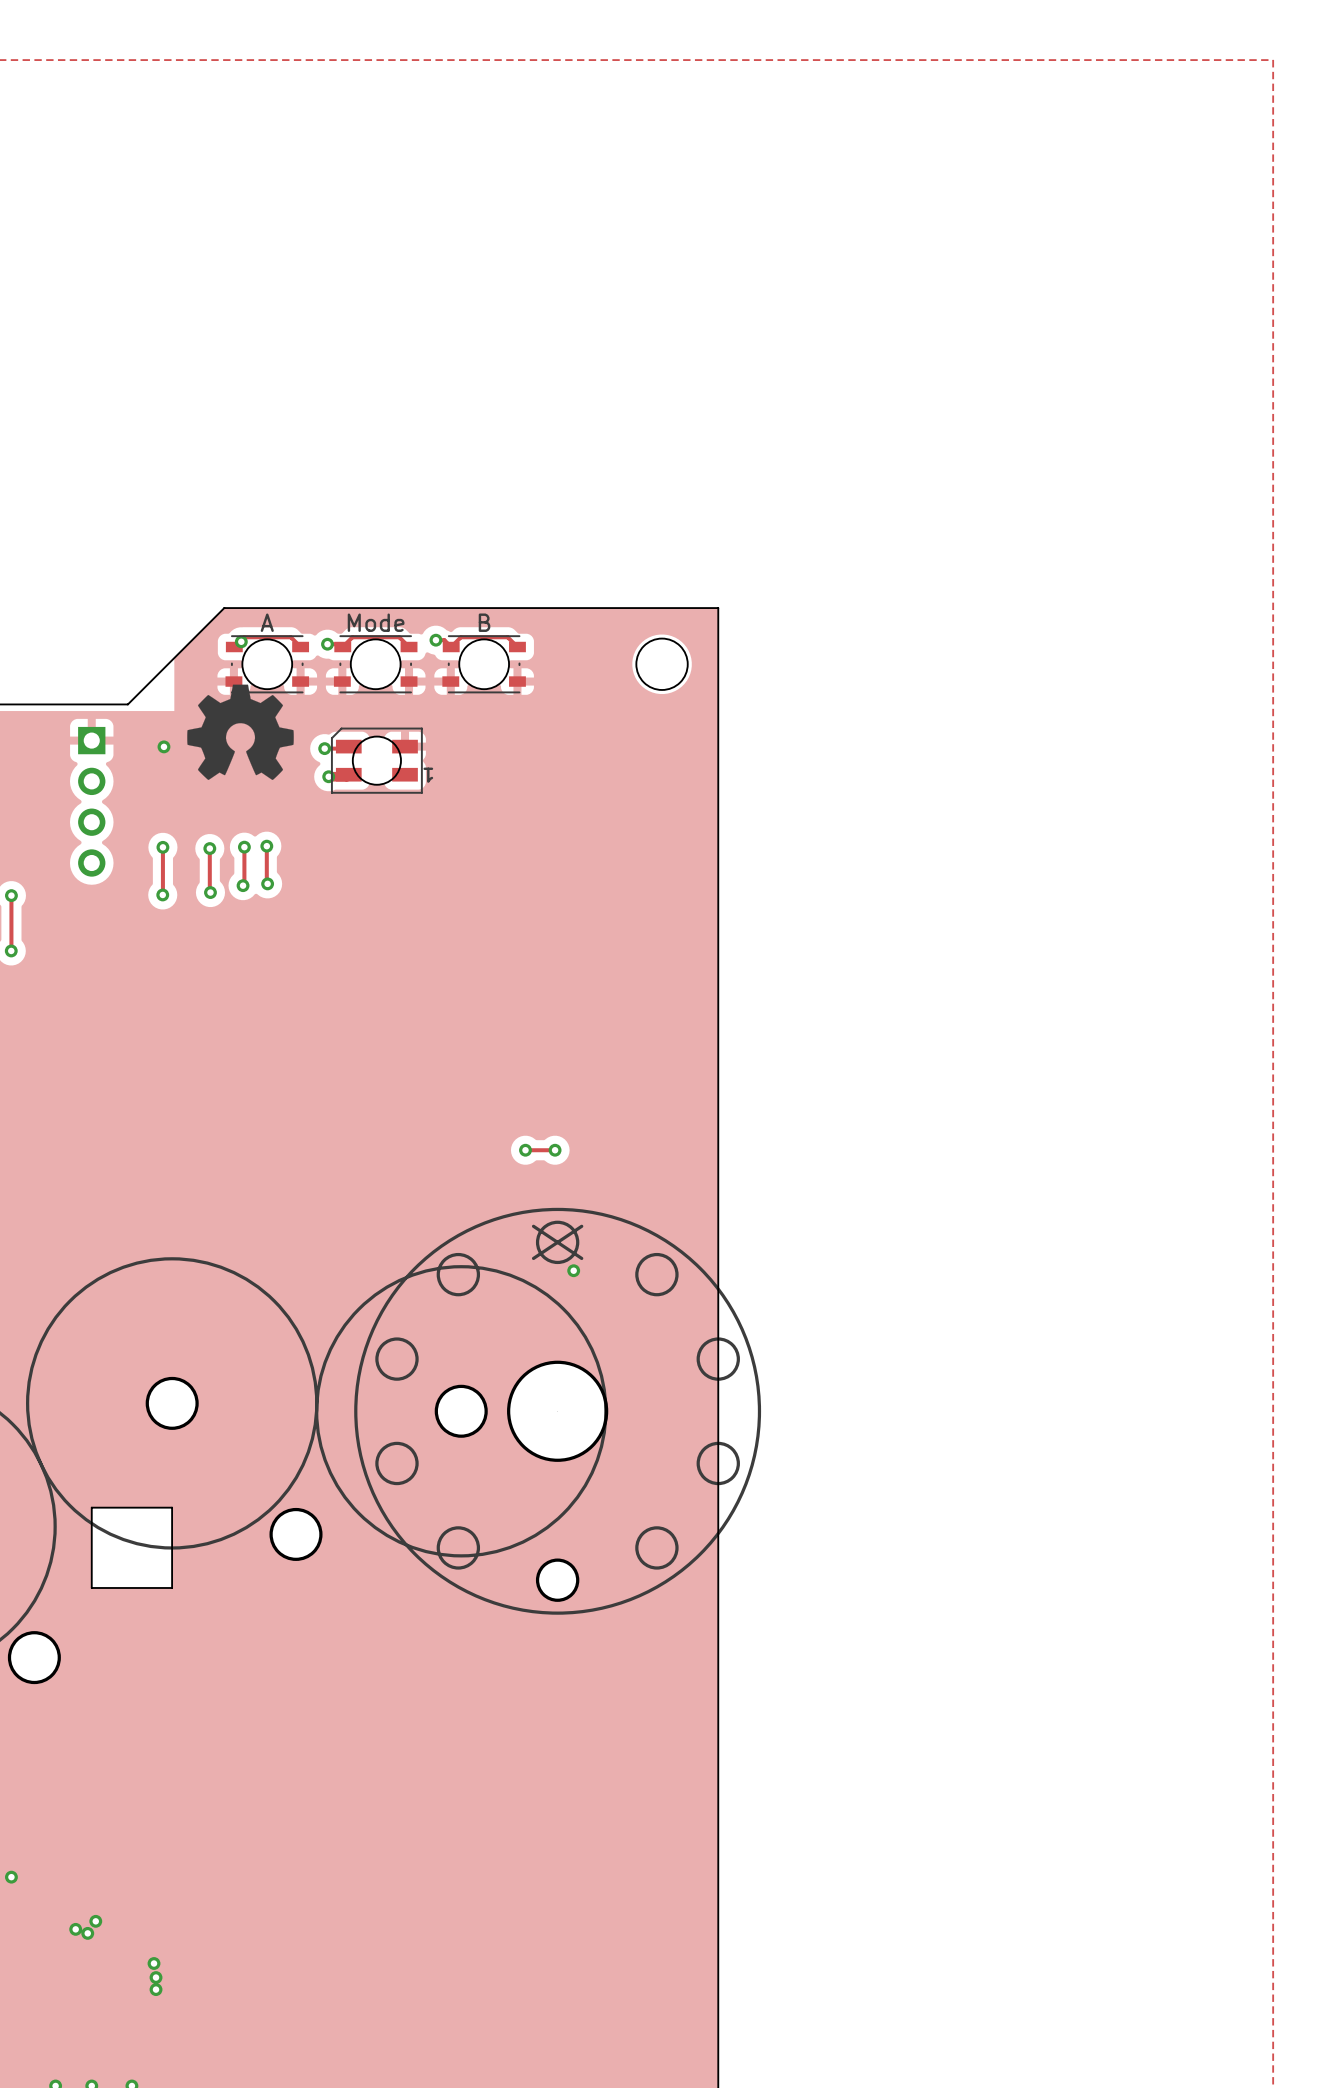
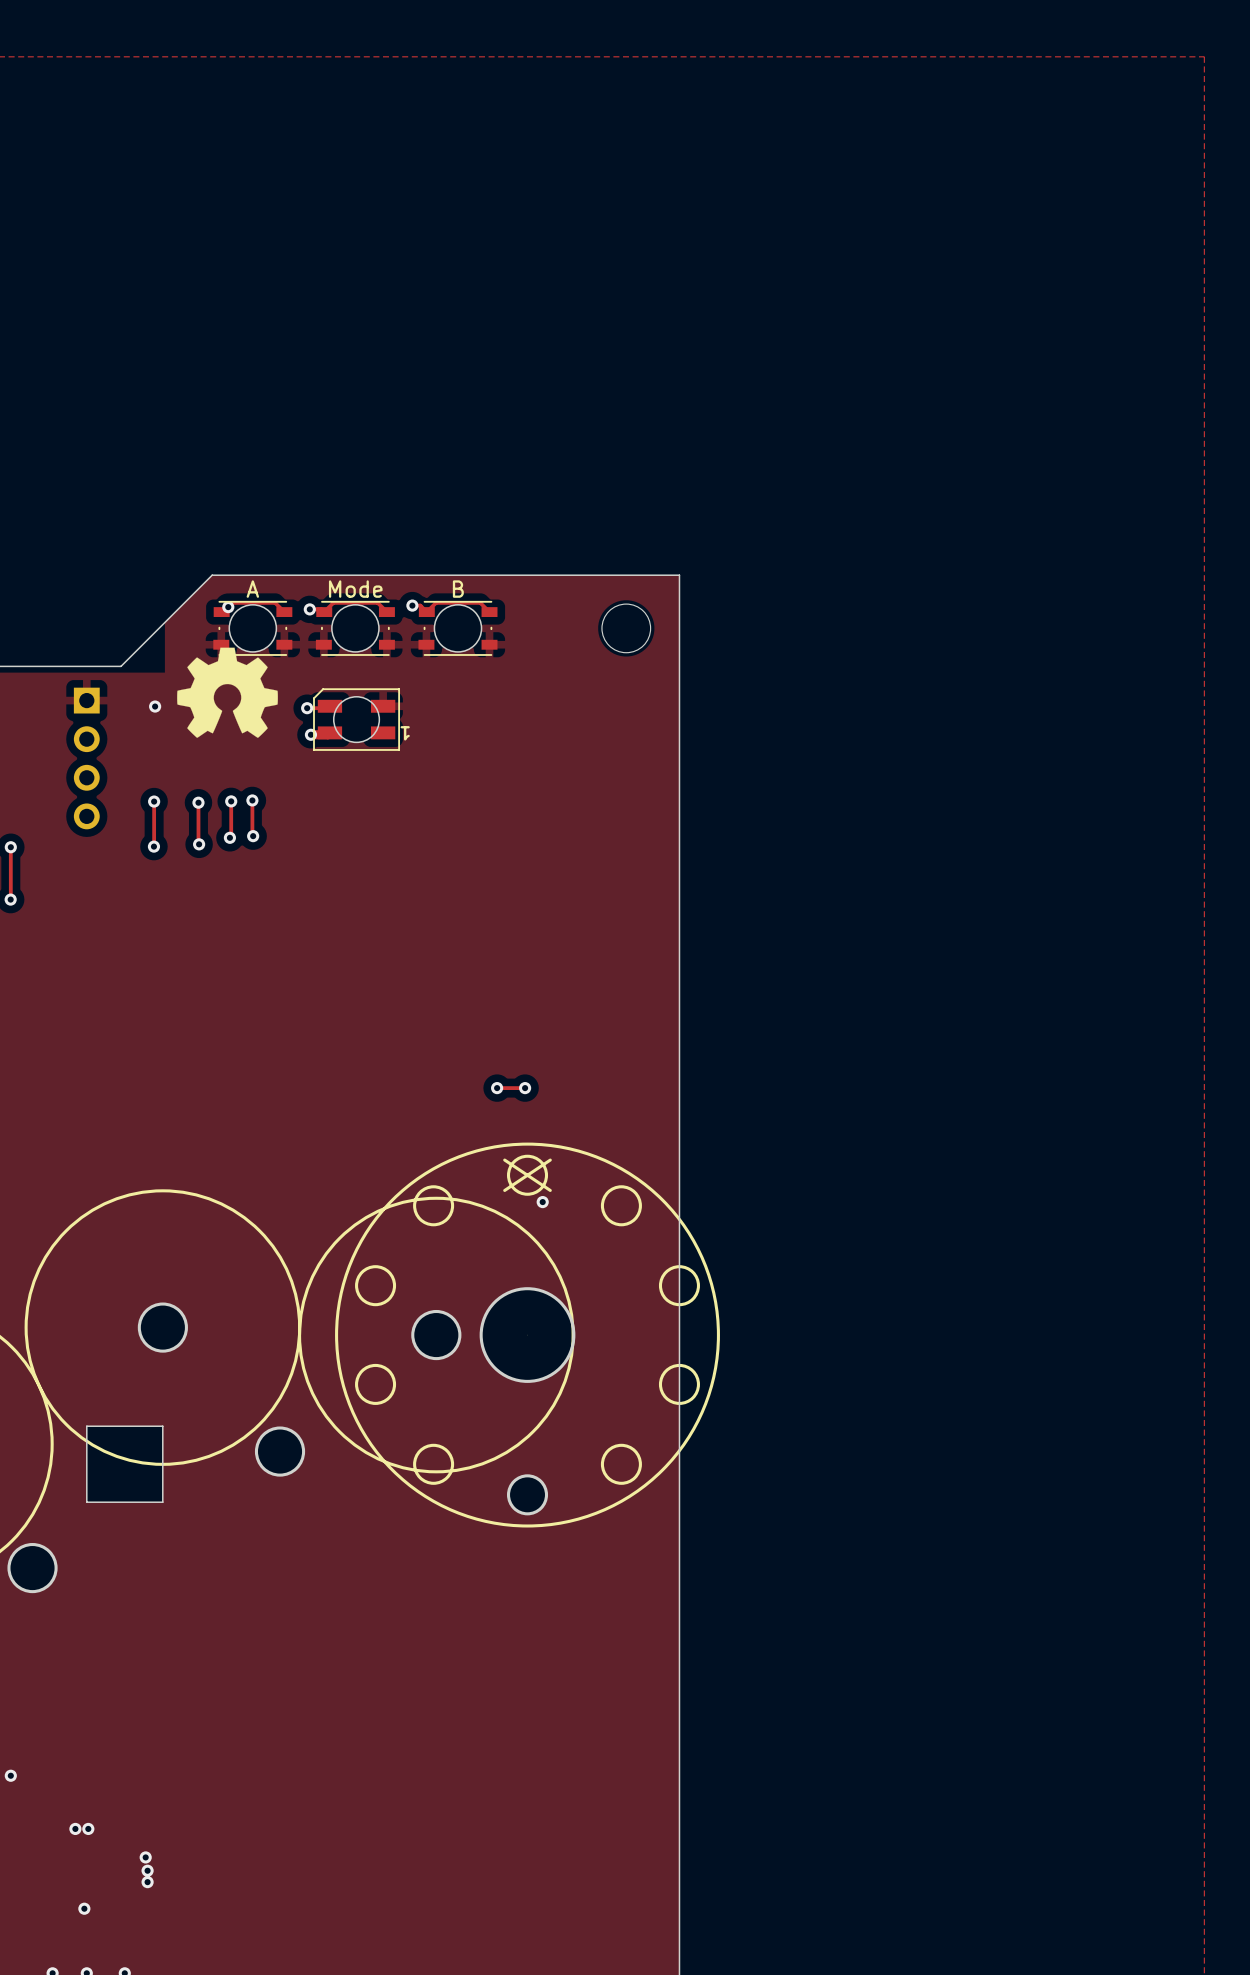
via: (95, 1921) -> none
via: (75, 1929) -> none
via: none -> (75, 1828)
via: (87, 1933) -> none
via: none -> (88, 1828)
via: none -> (84, 1908)

